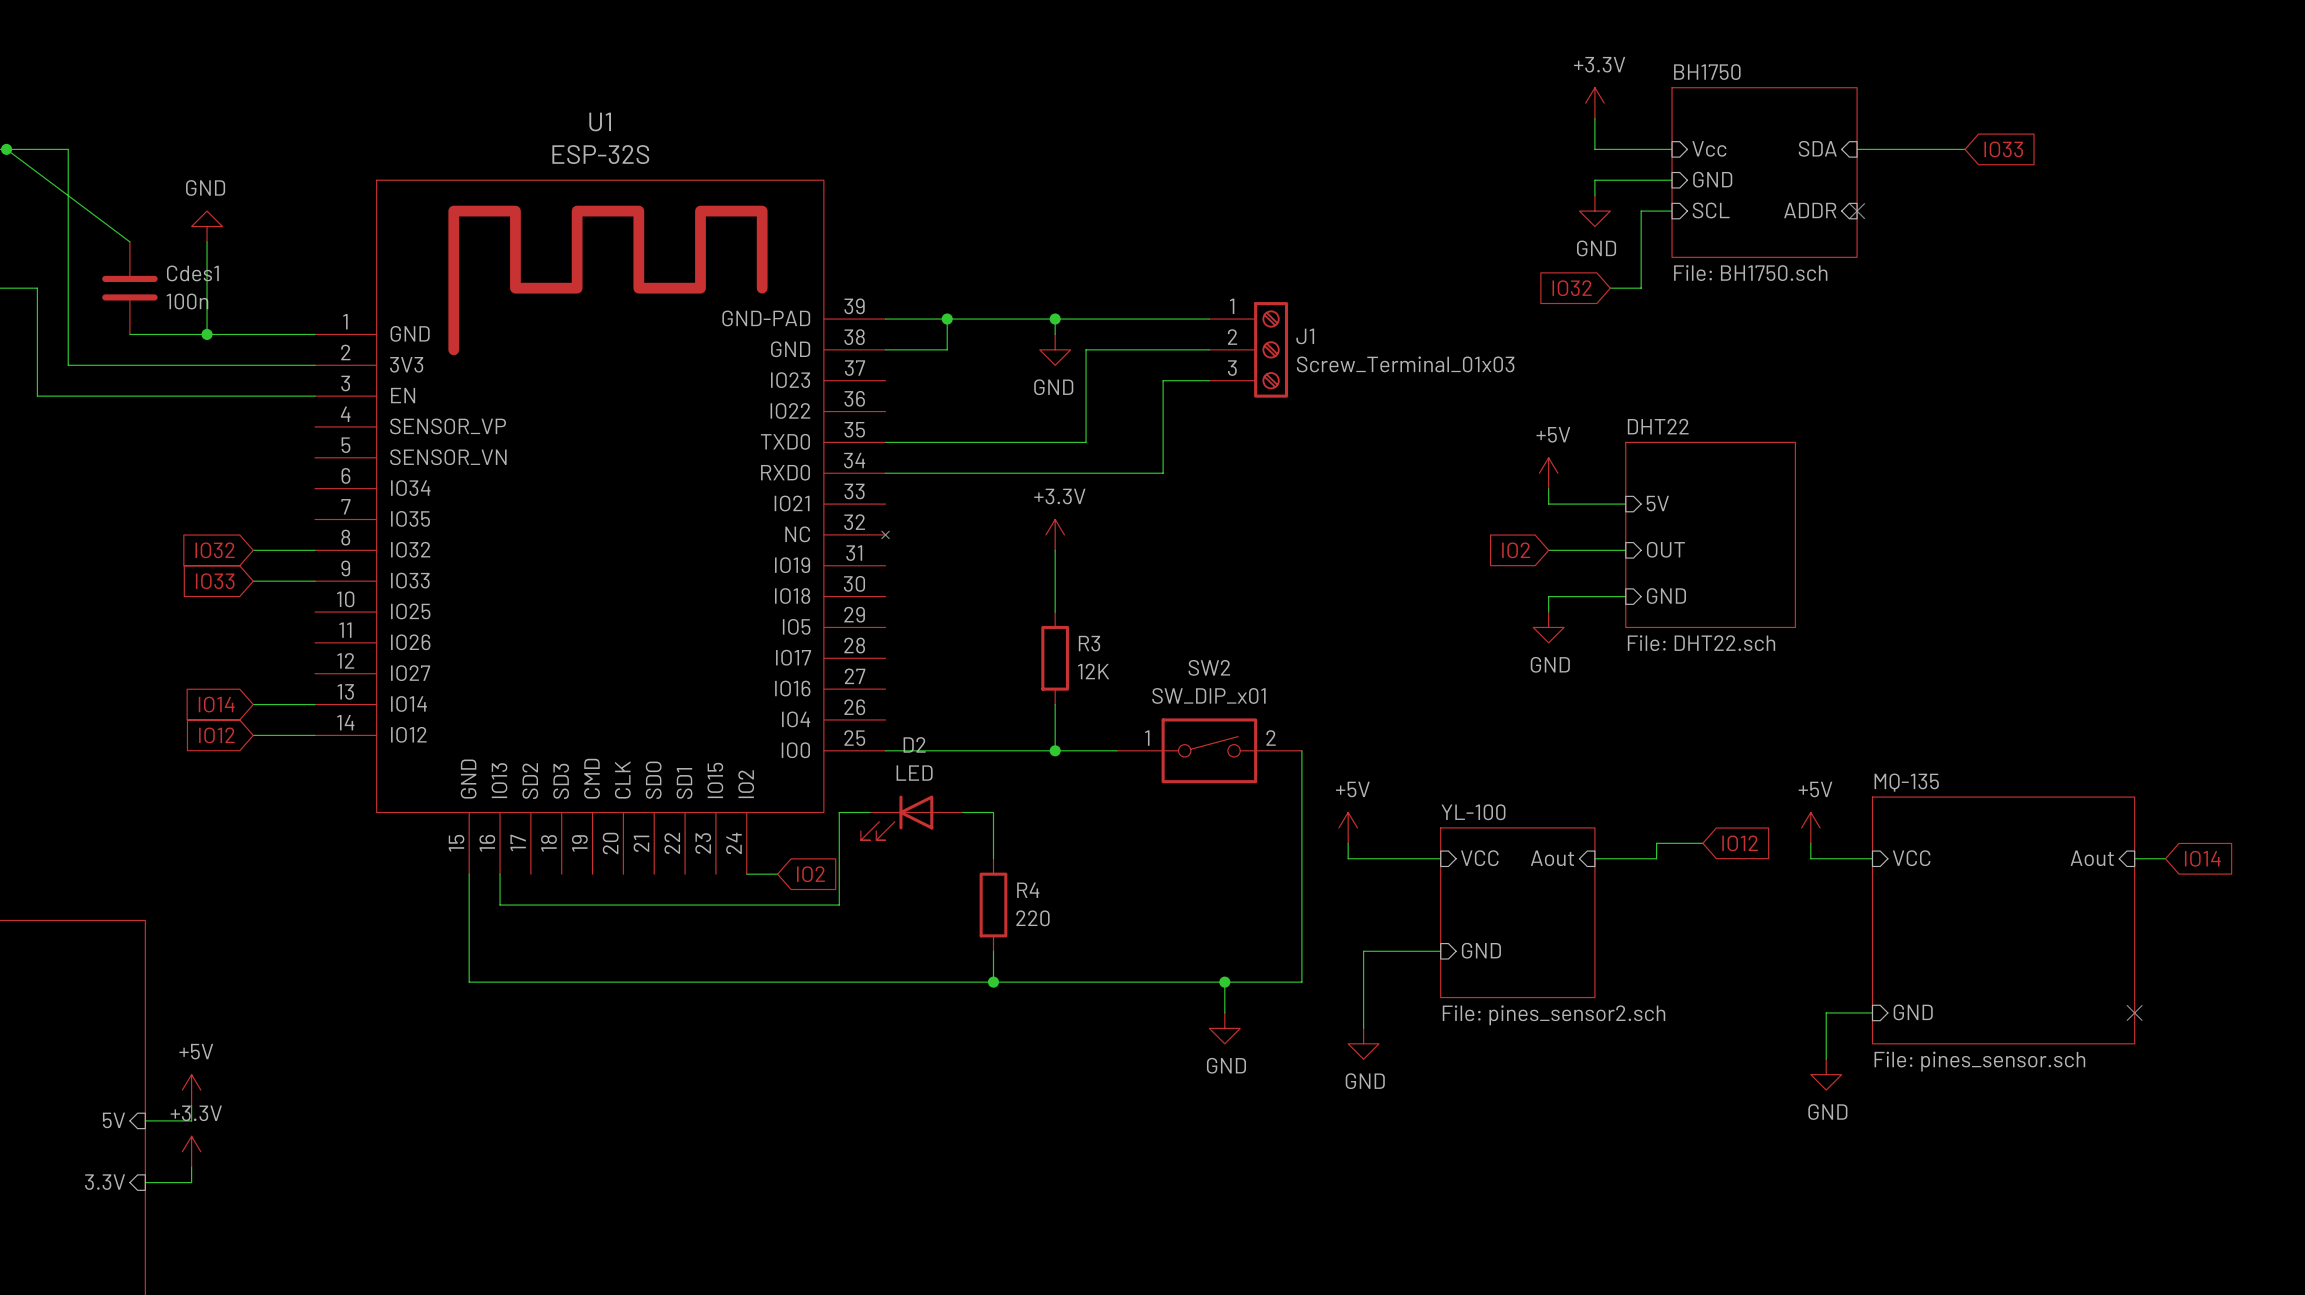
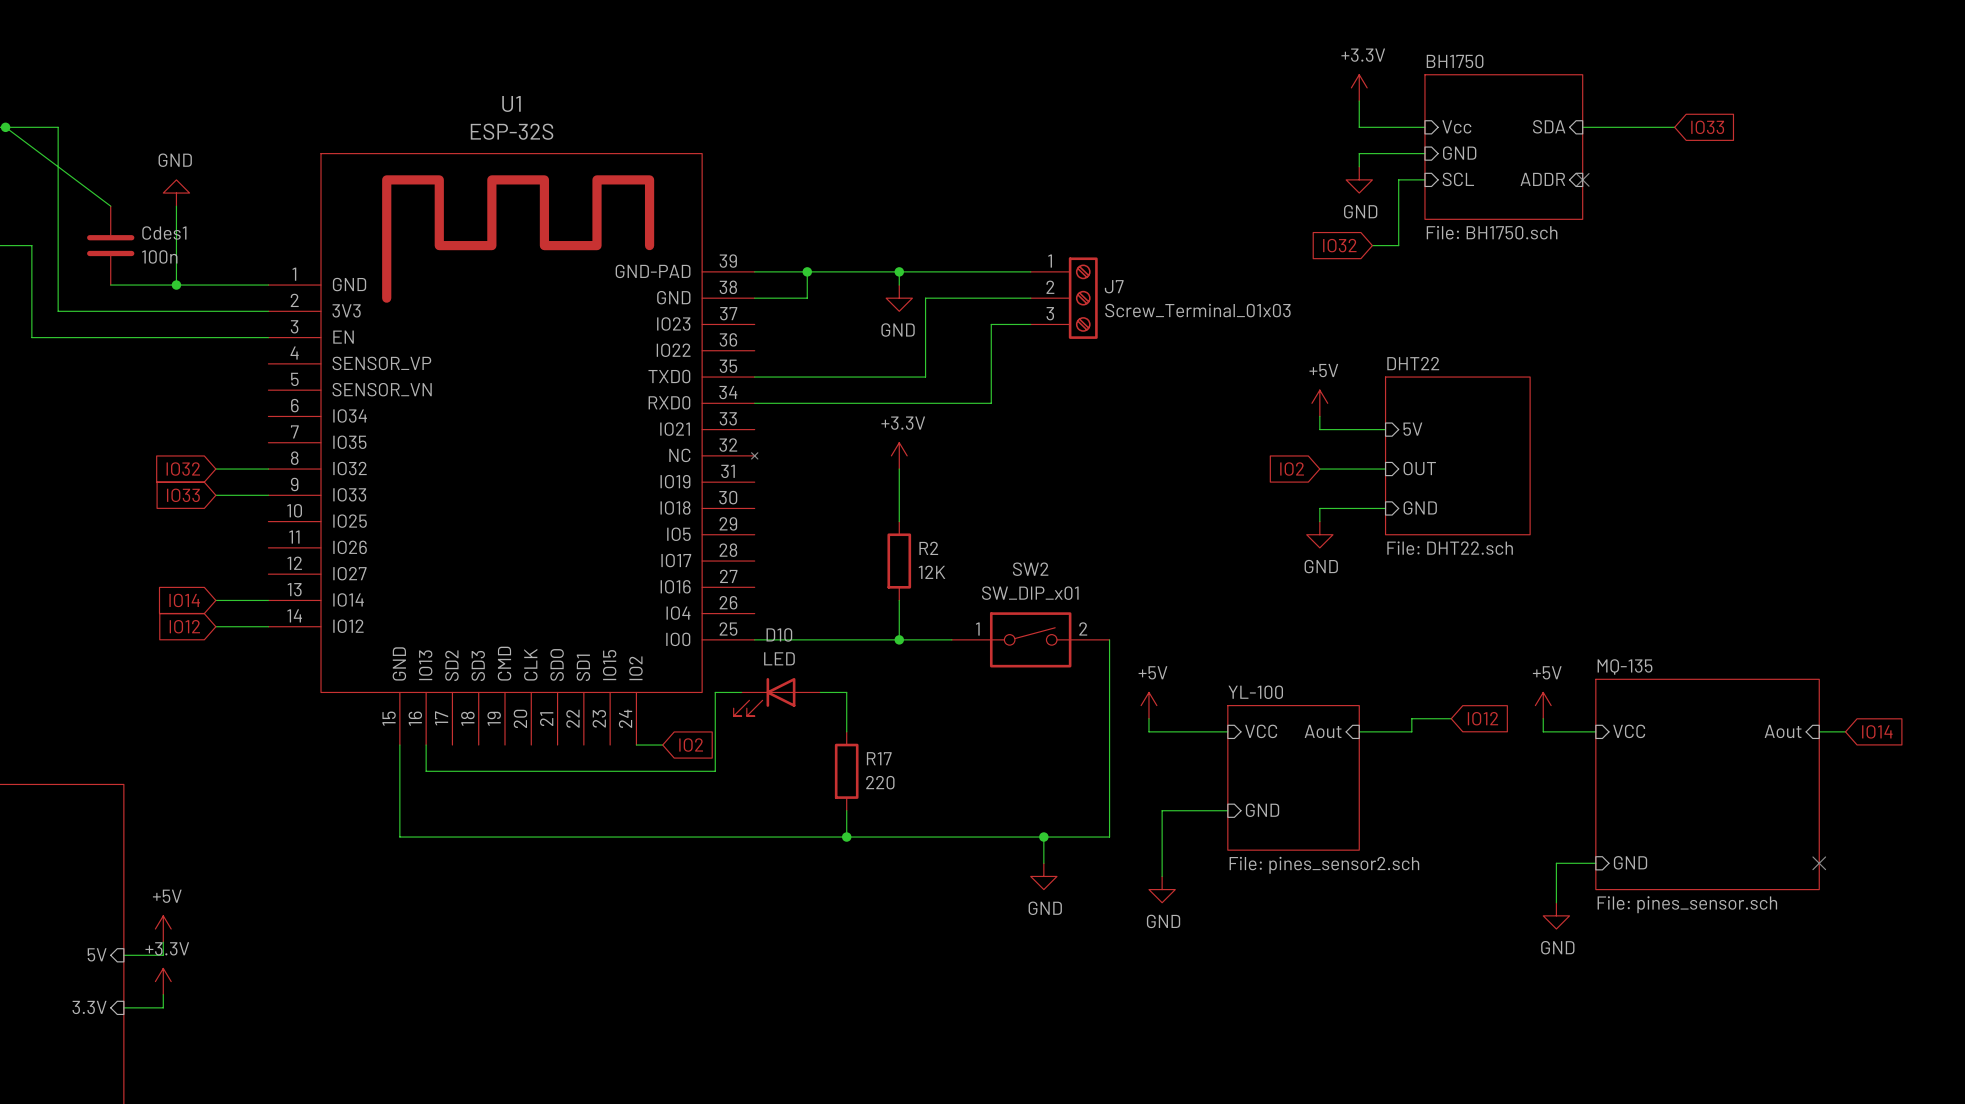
J1 name: J1 (1305, 336) -> J7 (1114, 286)
R3 name: R3 (1089, 643) -> R2 (928, 548)
D2 name: D2 (914, 744) -> D10 (779, 634)
R4 name: R4 (1028, 890) -> R17 (879, 758)

